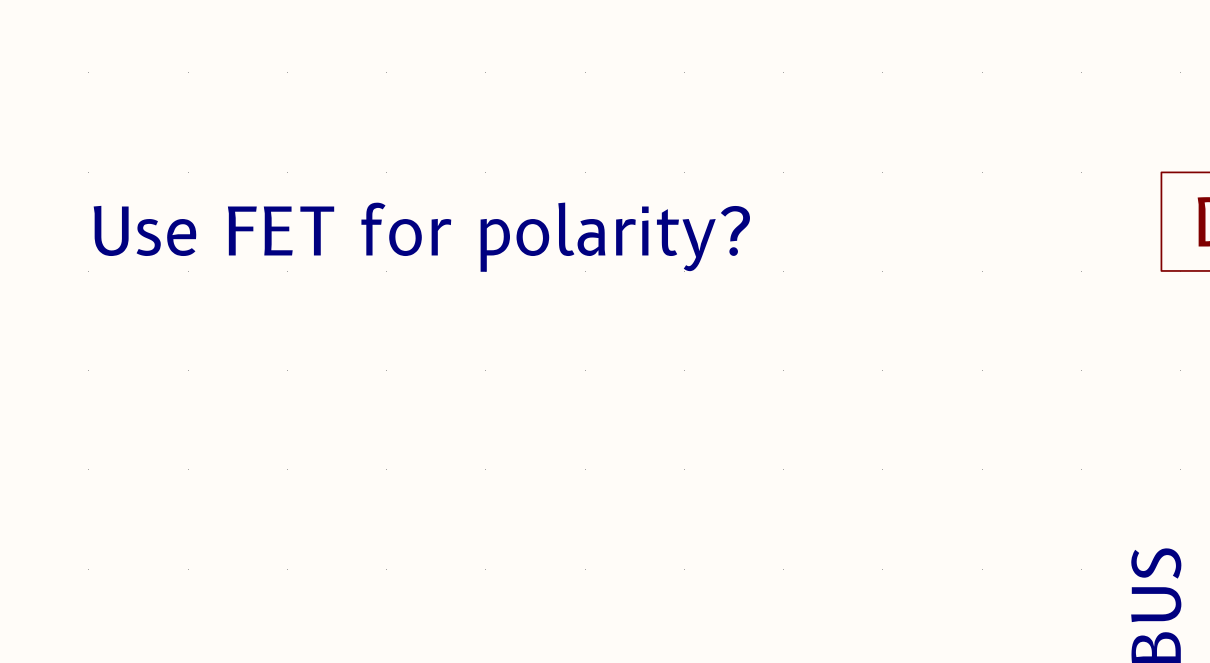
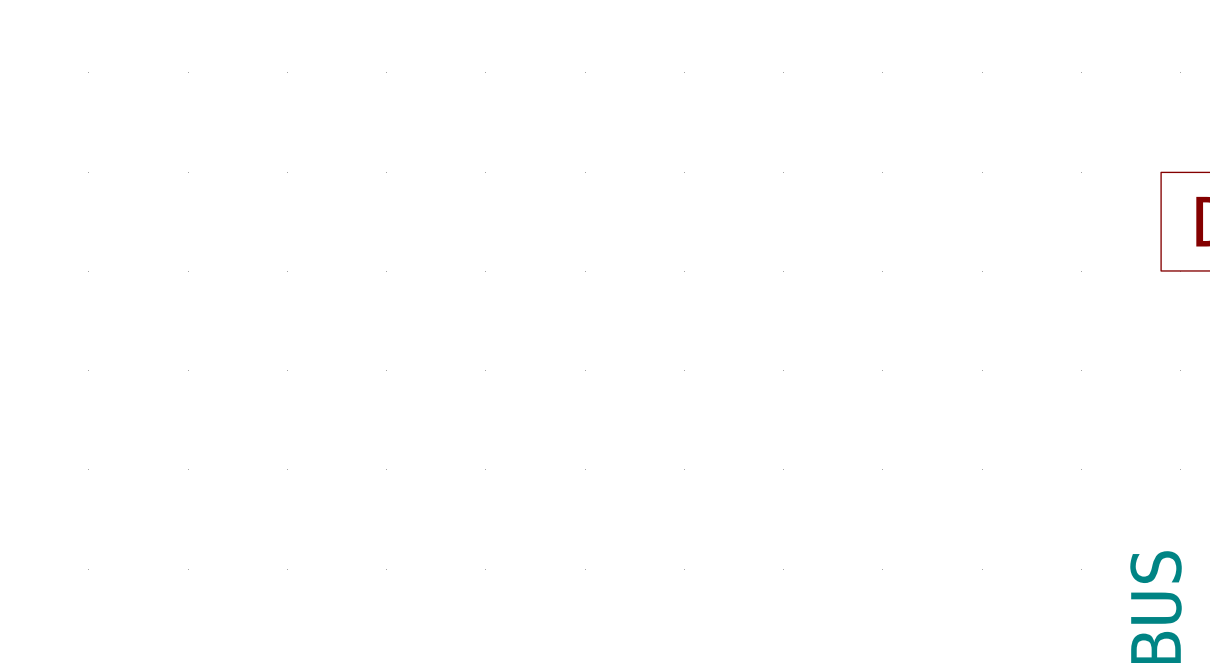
text: Use FET for polarity? (421, 237) -> none

